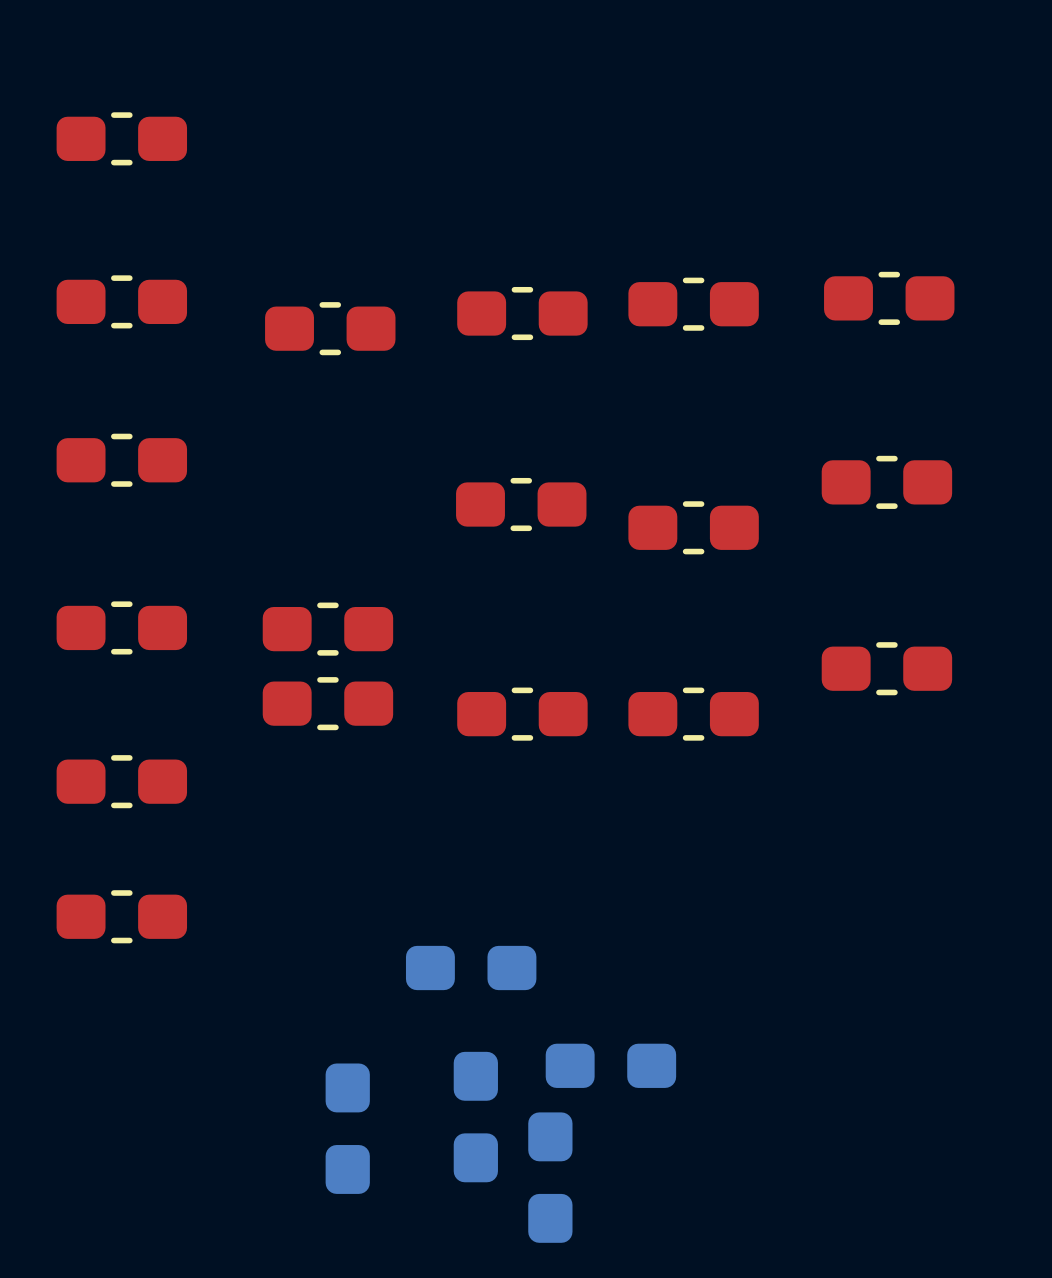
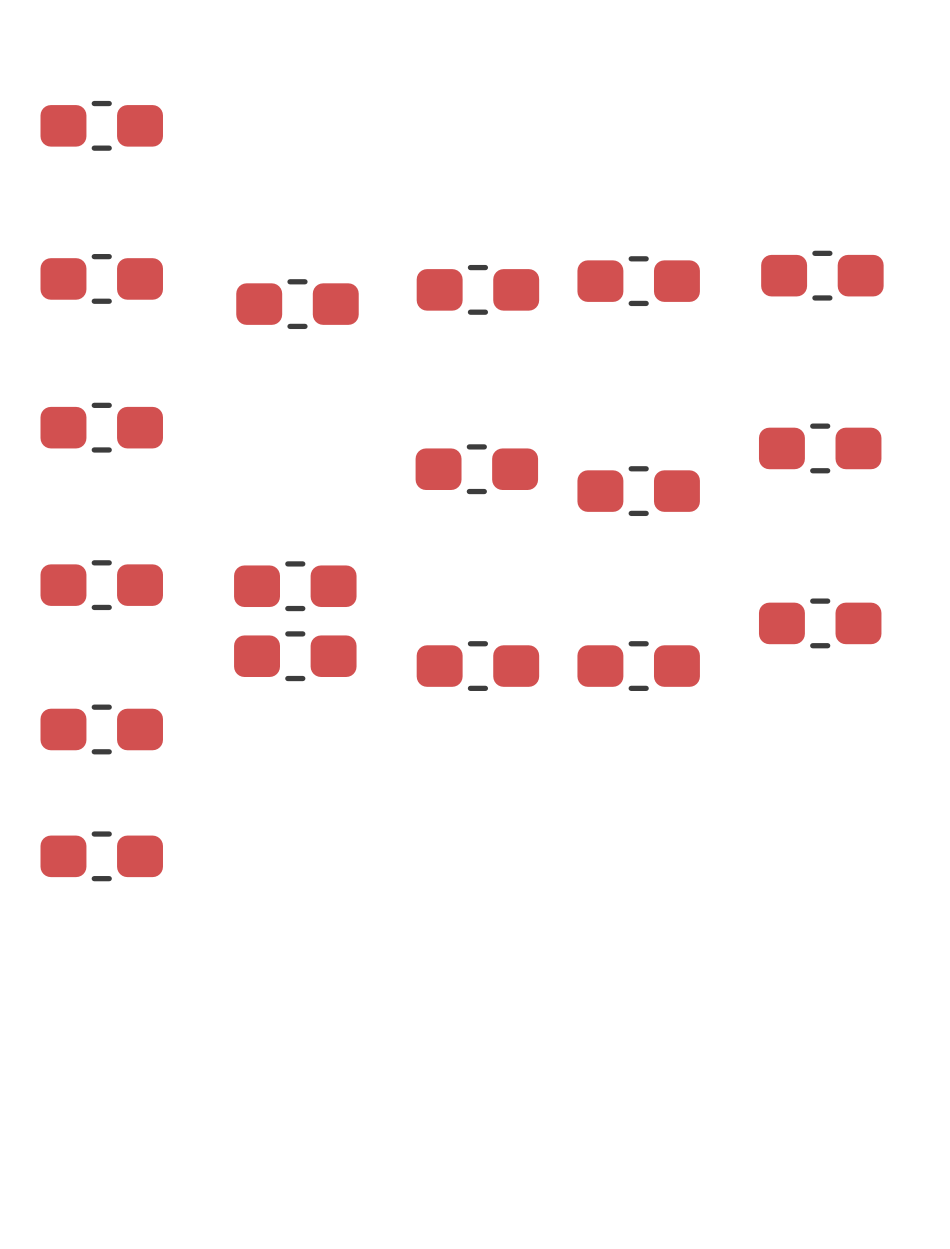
part: (471, 968) -> none
part: (610, 1065) -> none
part: (475, 1117) -> none
part: (347, 1128) -> none
part: (550, 1177) -> none

